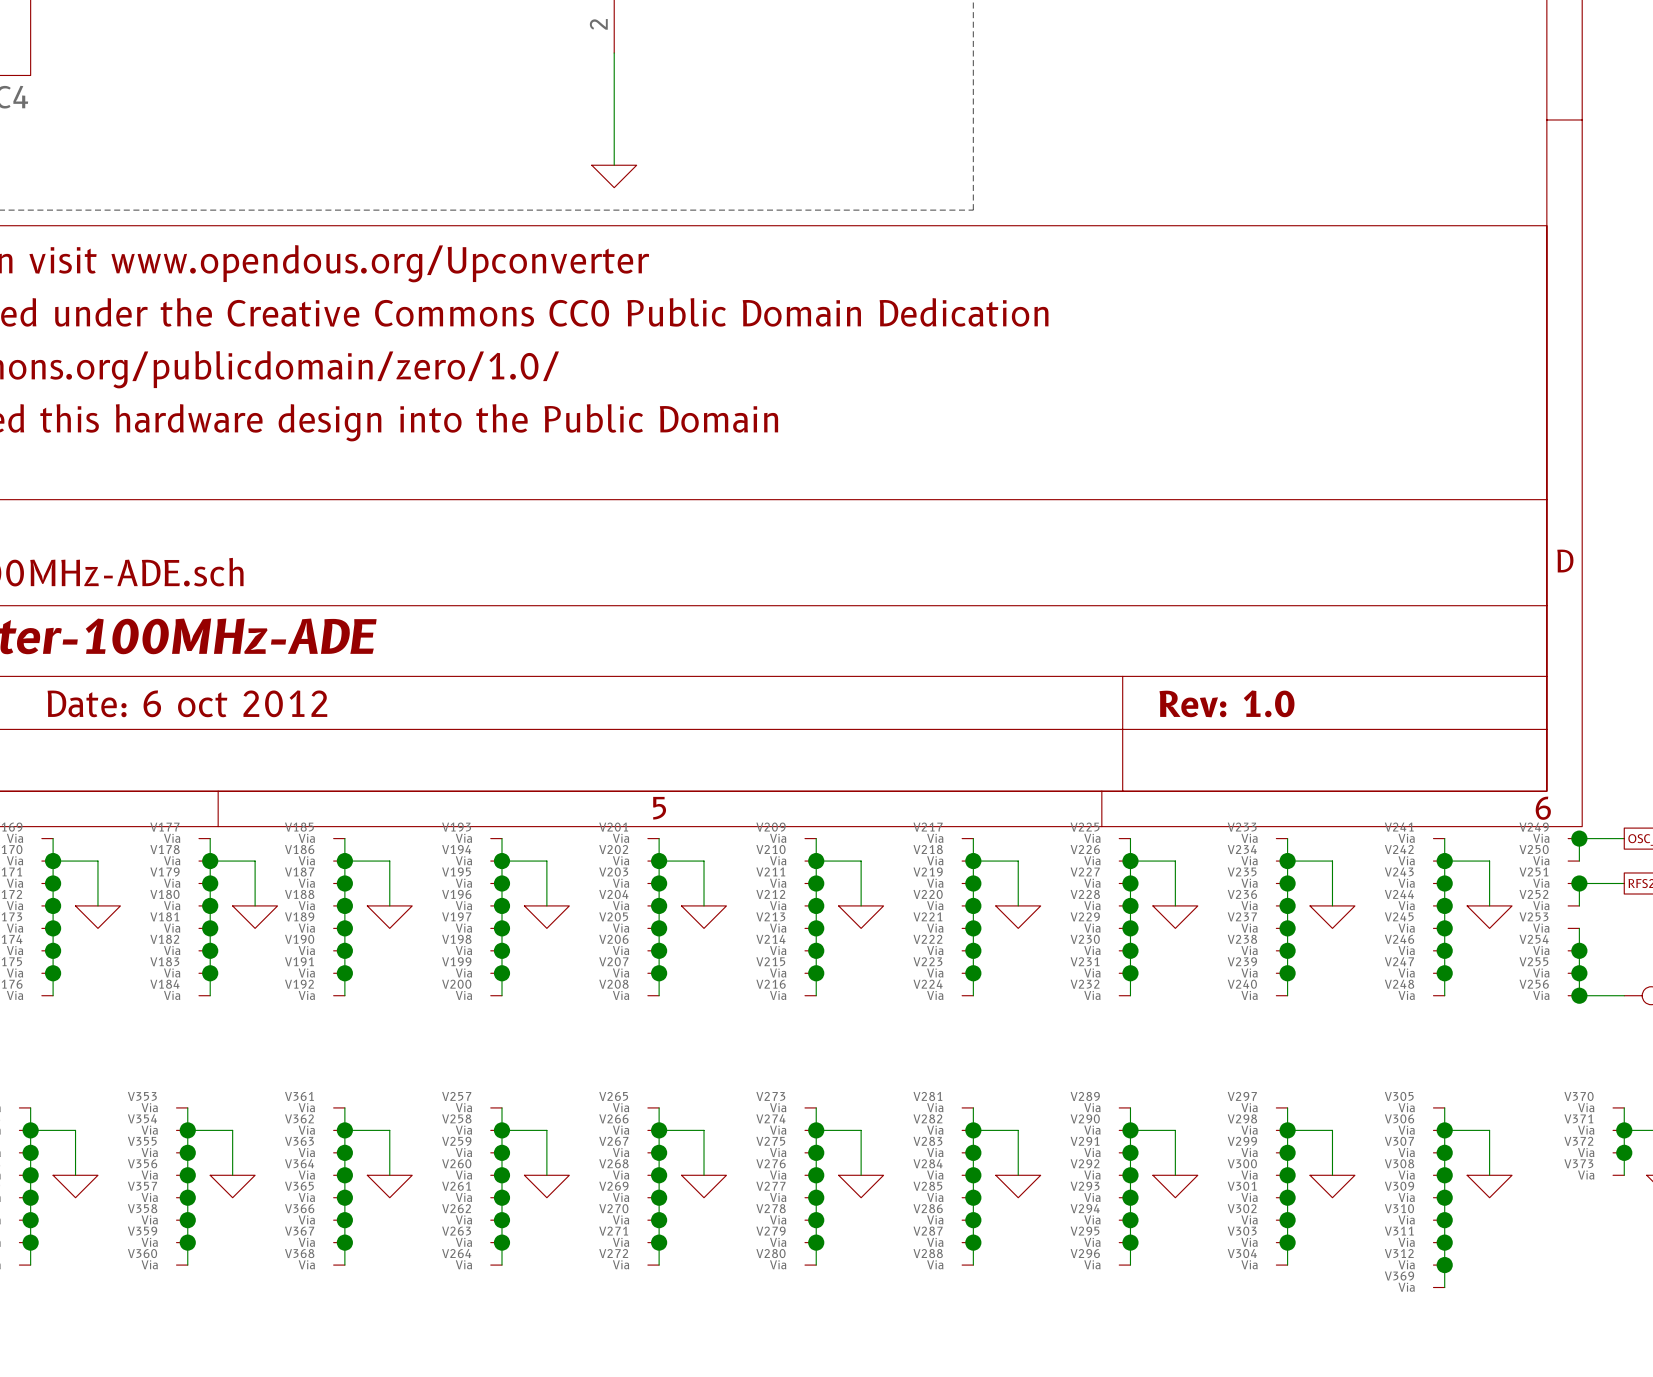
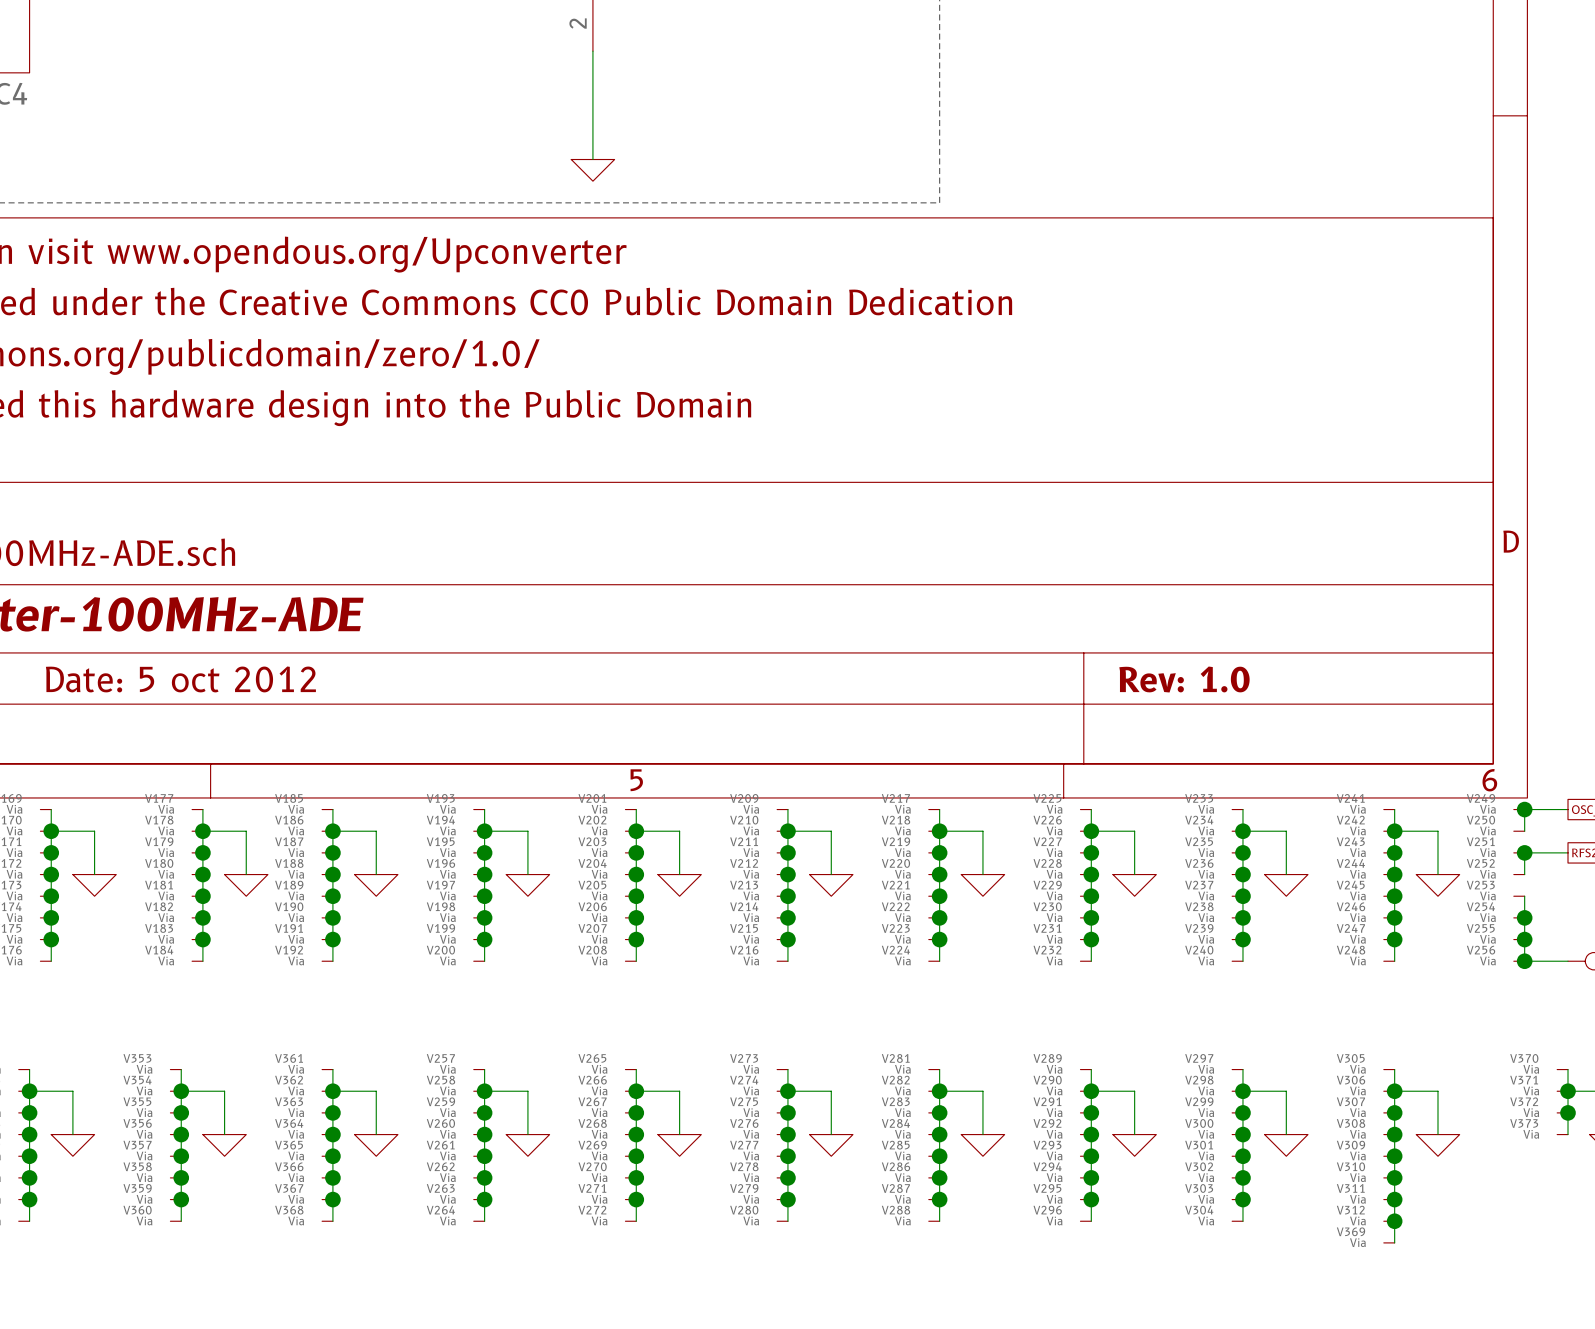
title block: Date: 6 oct 2012 (187, 703) -> Date: 5 oct 2012 (180, 679)

